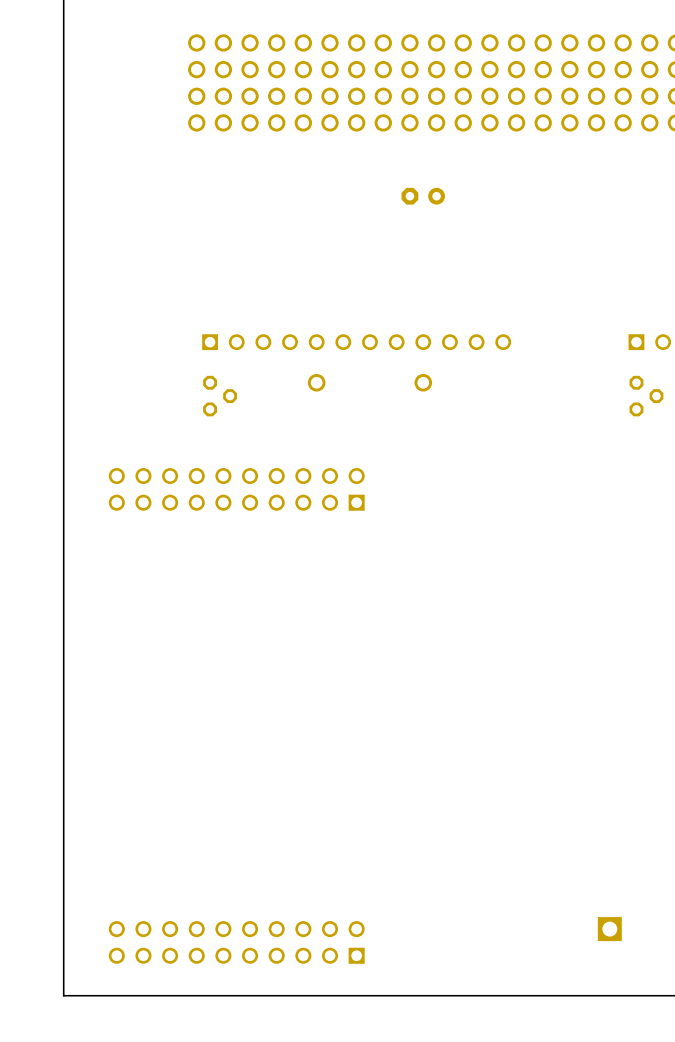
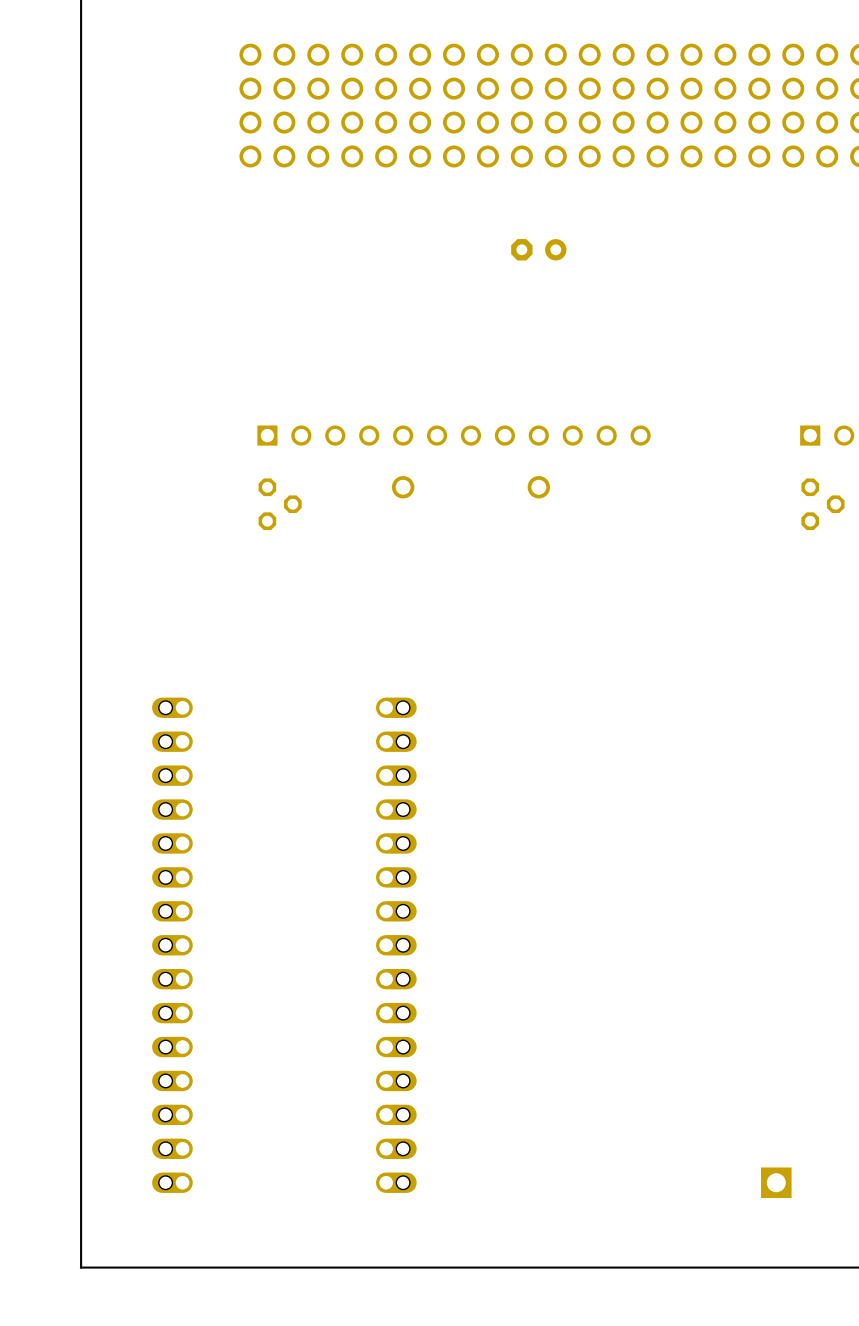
part: (236, 489) -> none
part: none -> (172, 945)
part: none -> (396, 945)
part: (236, 942) -> none

